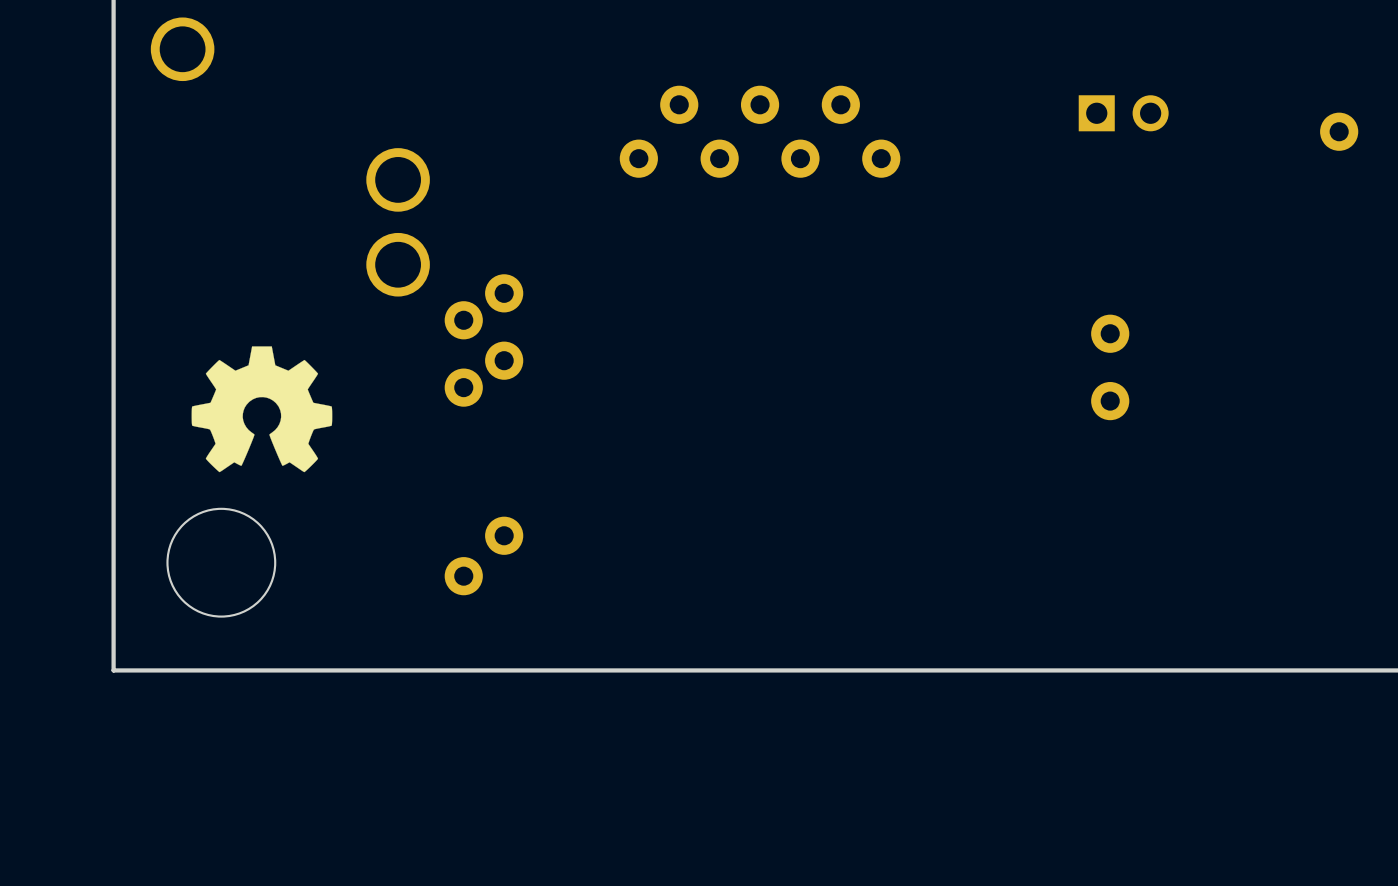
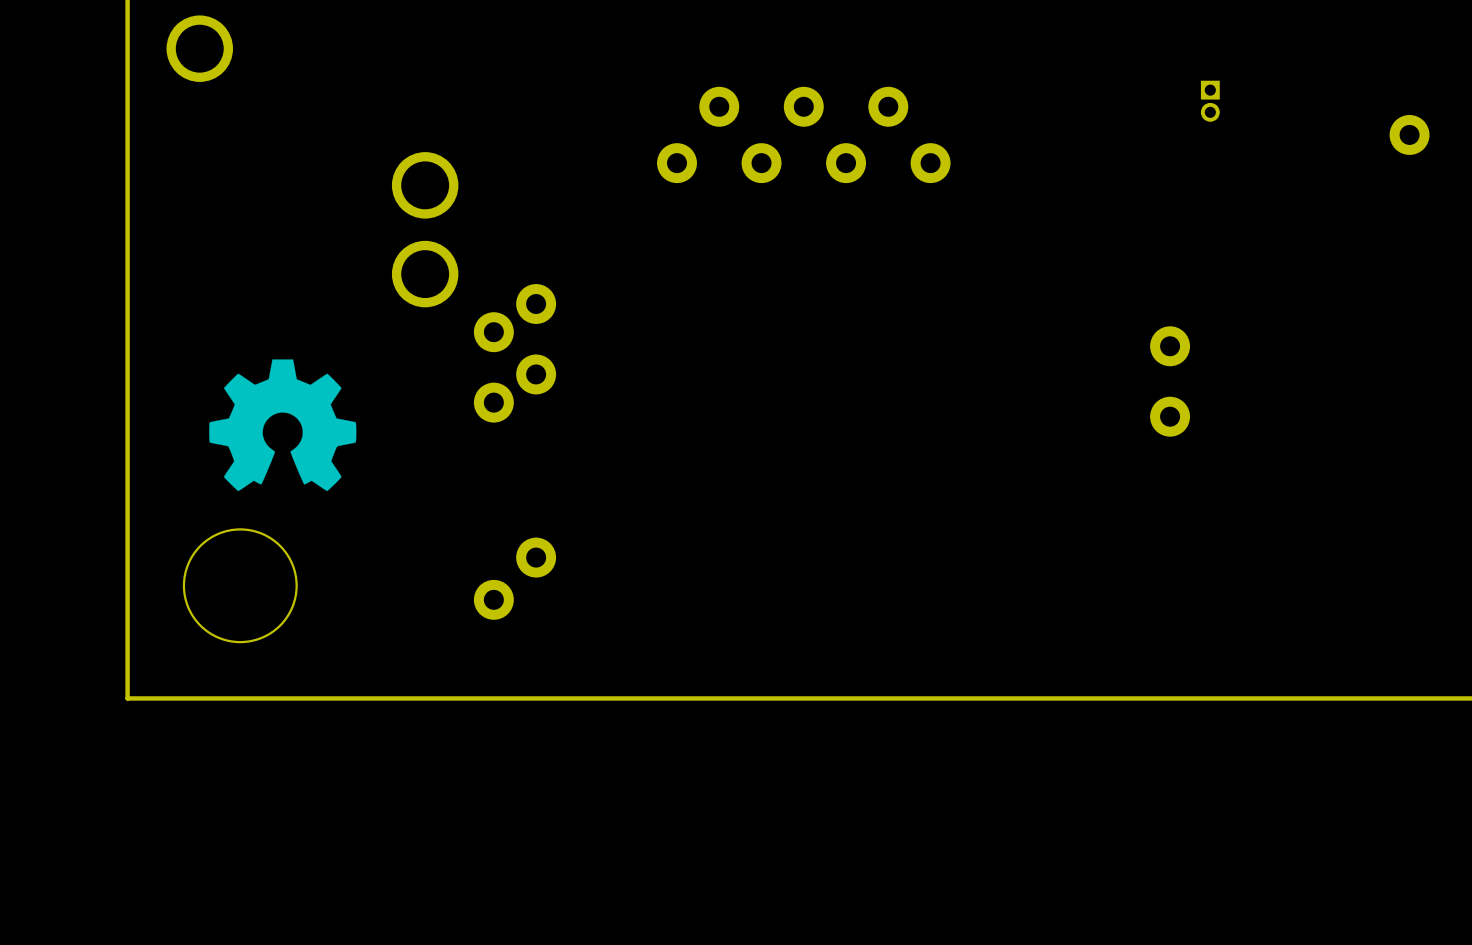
part: none -> (1210, 101)
part: (1123, 113) -> none

